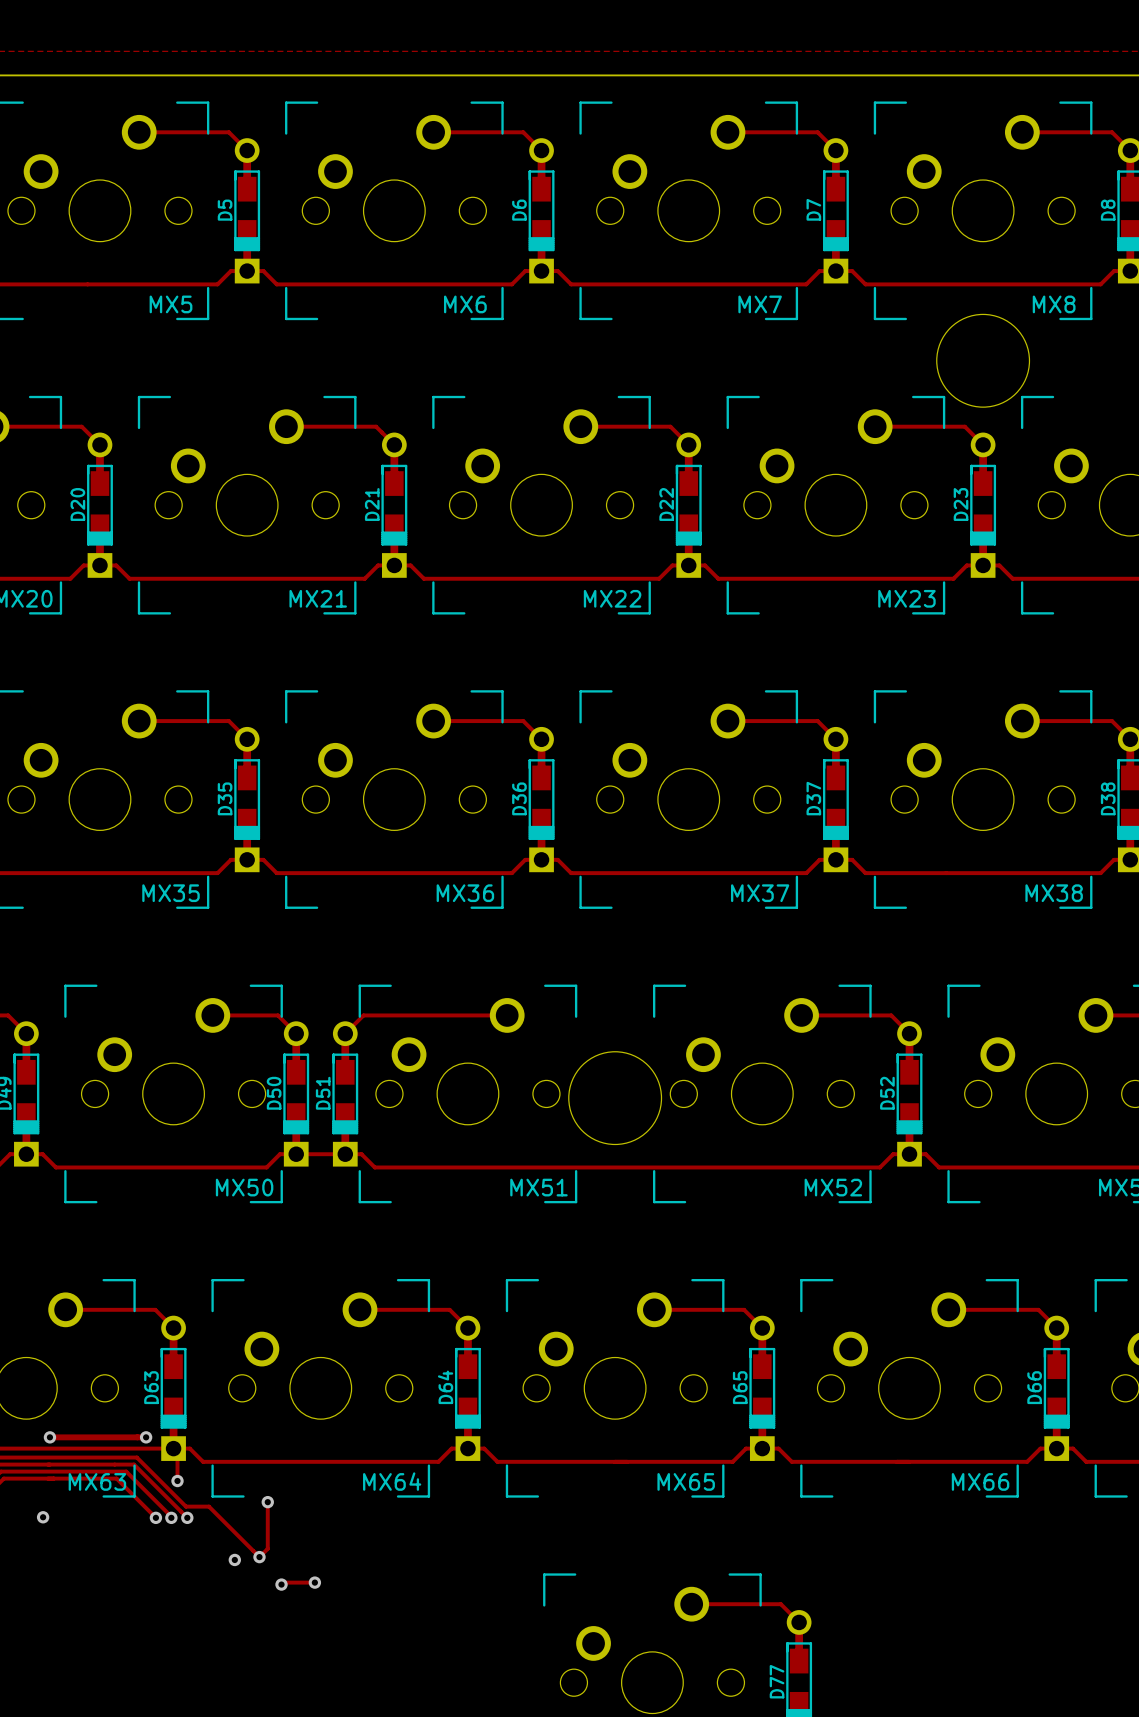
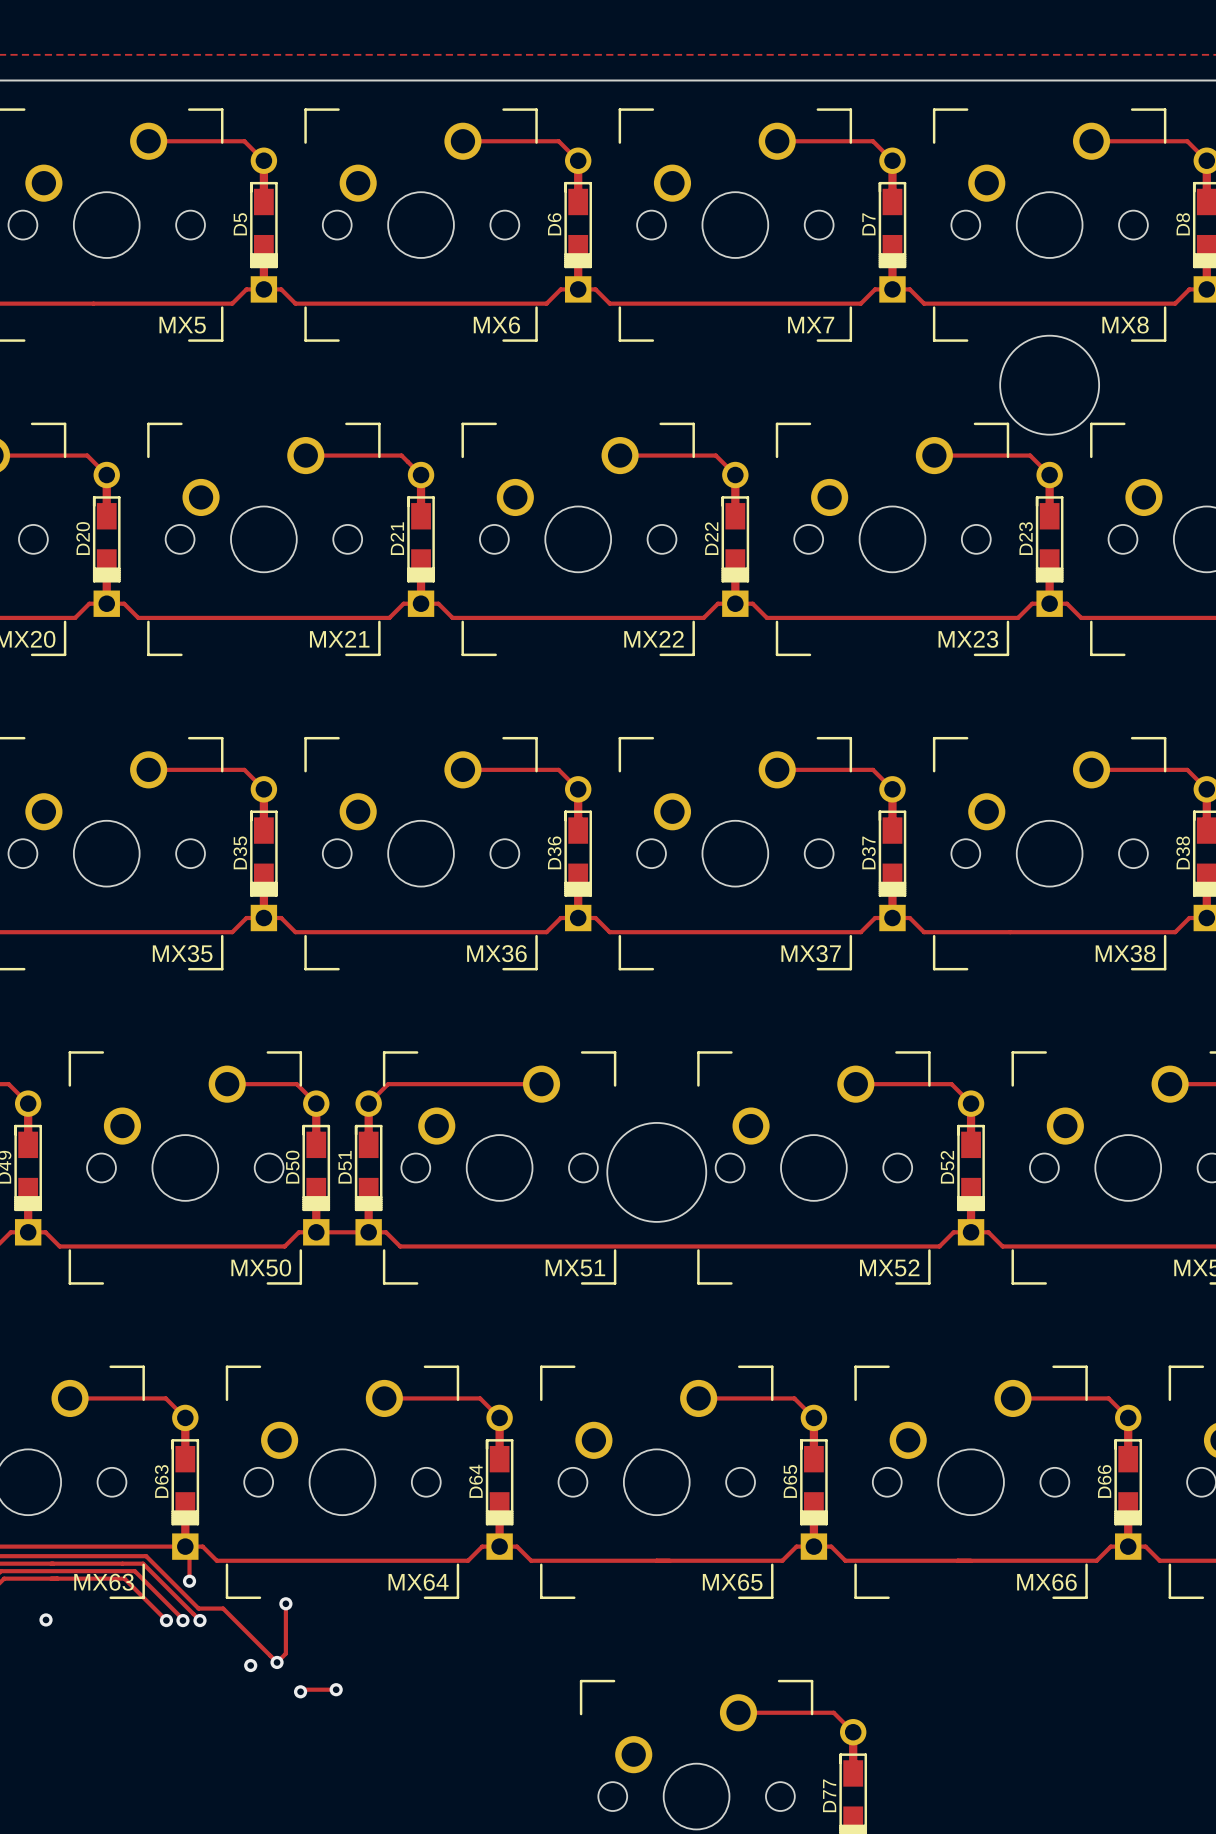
track: (49, 1437) (146, 1437) -> none
via: (49, 1437) -> none
via: (146, 1437) -> none

